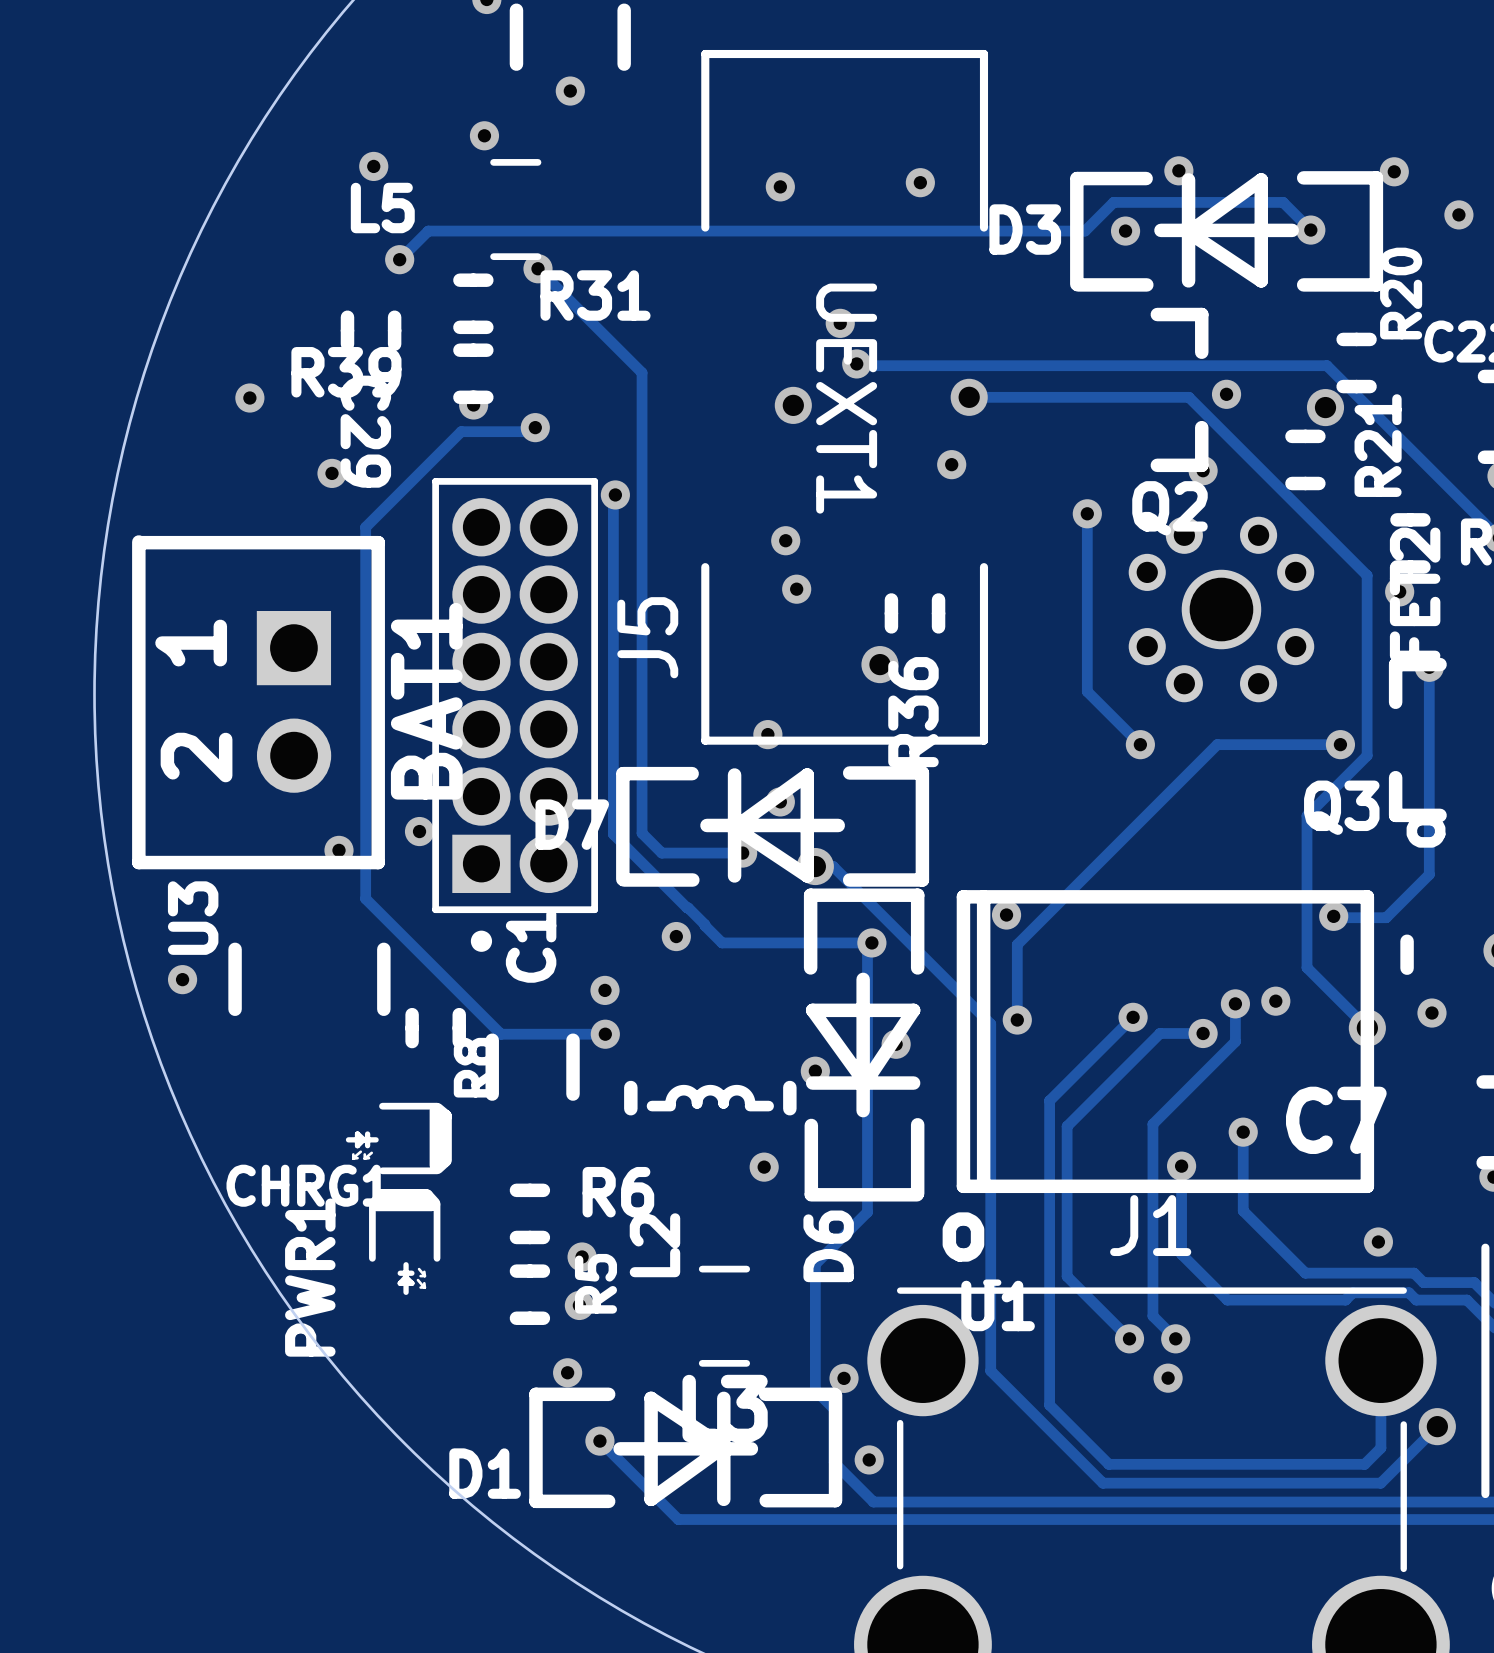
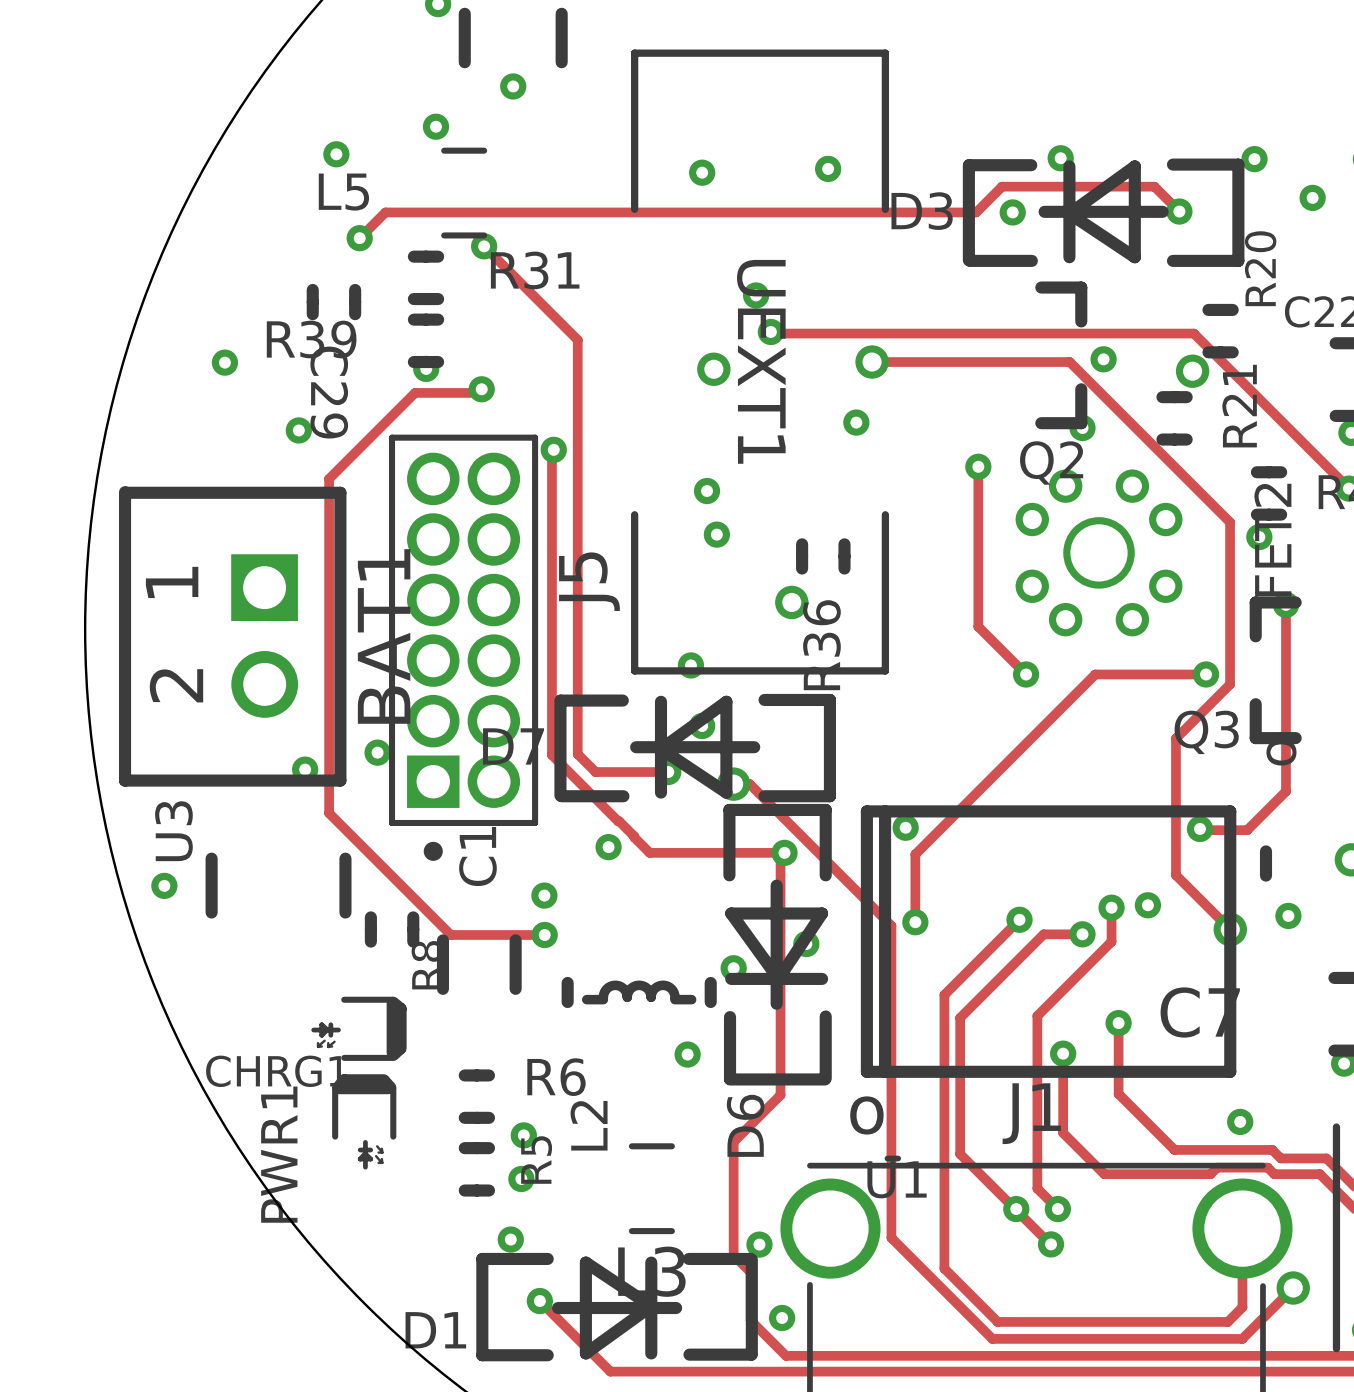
track: (1067, 1276) (1129, 1338) -> (960, 1152) (1050, 1244)

